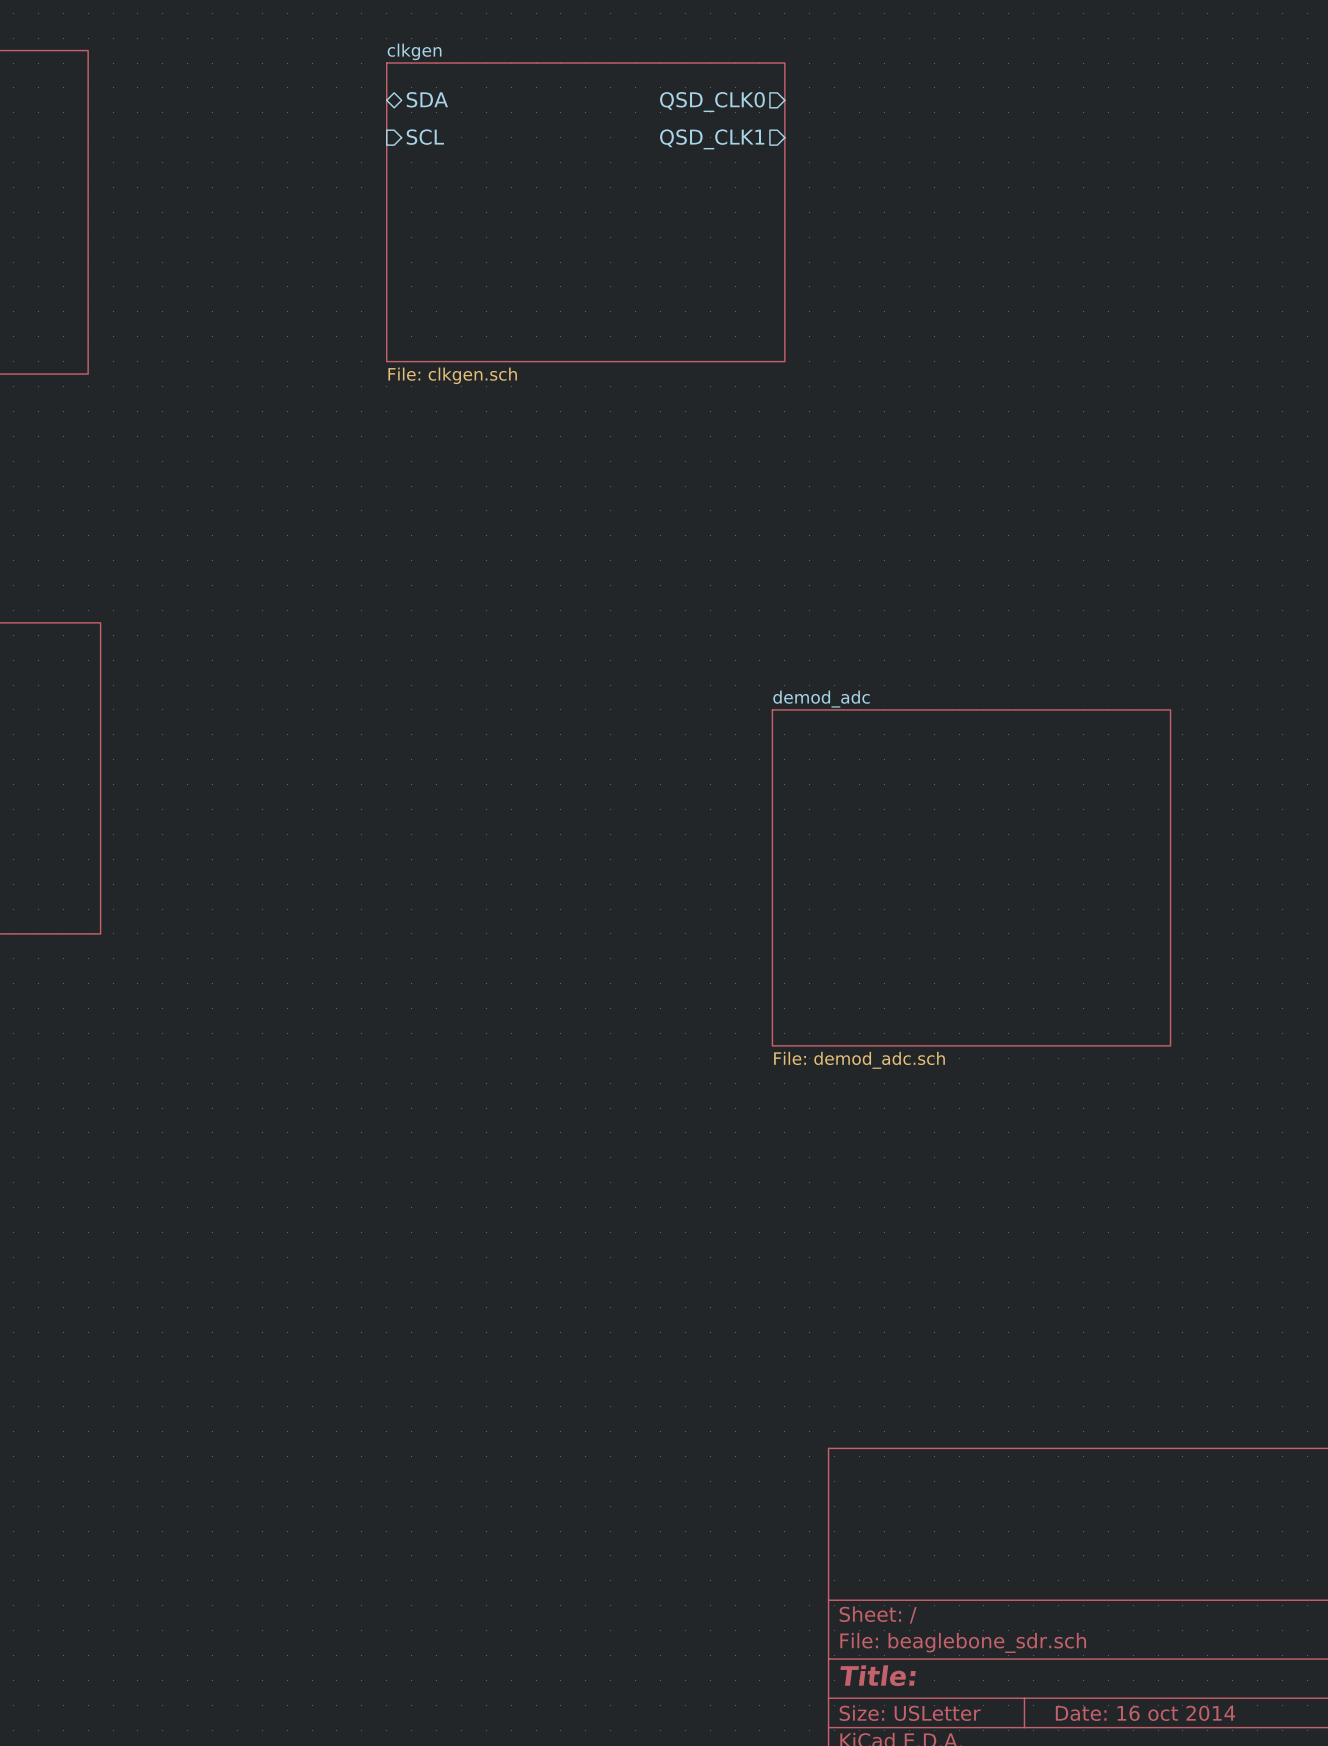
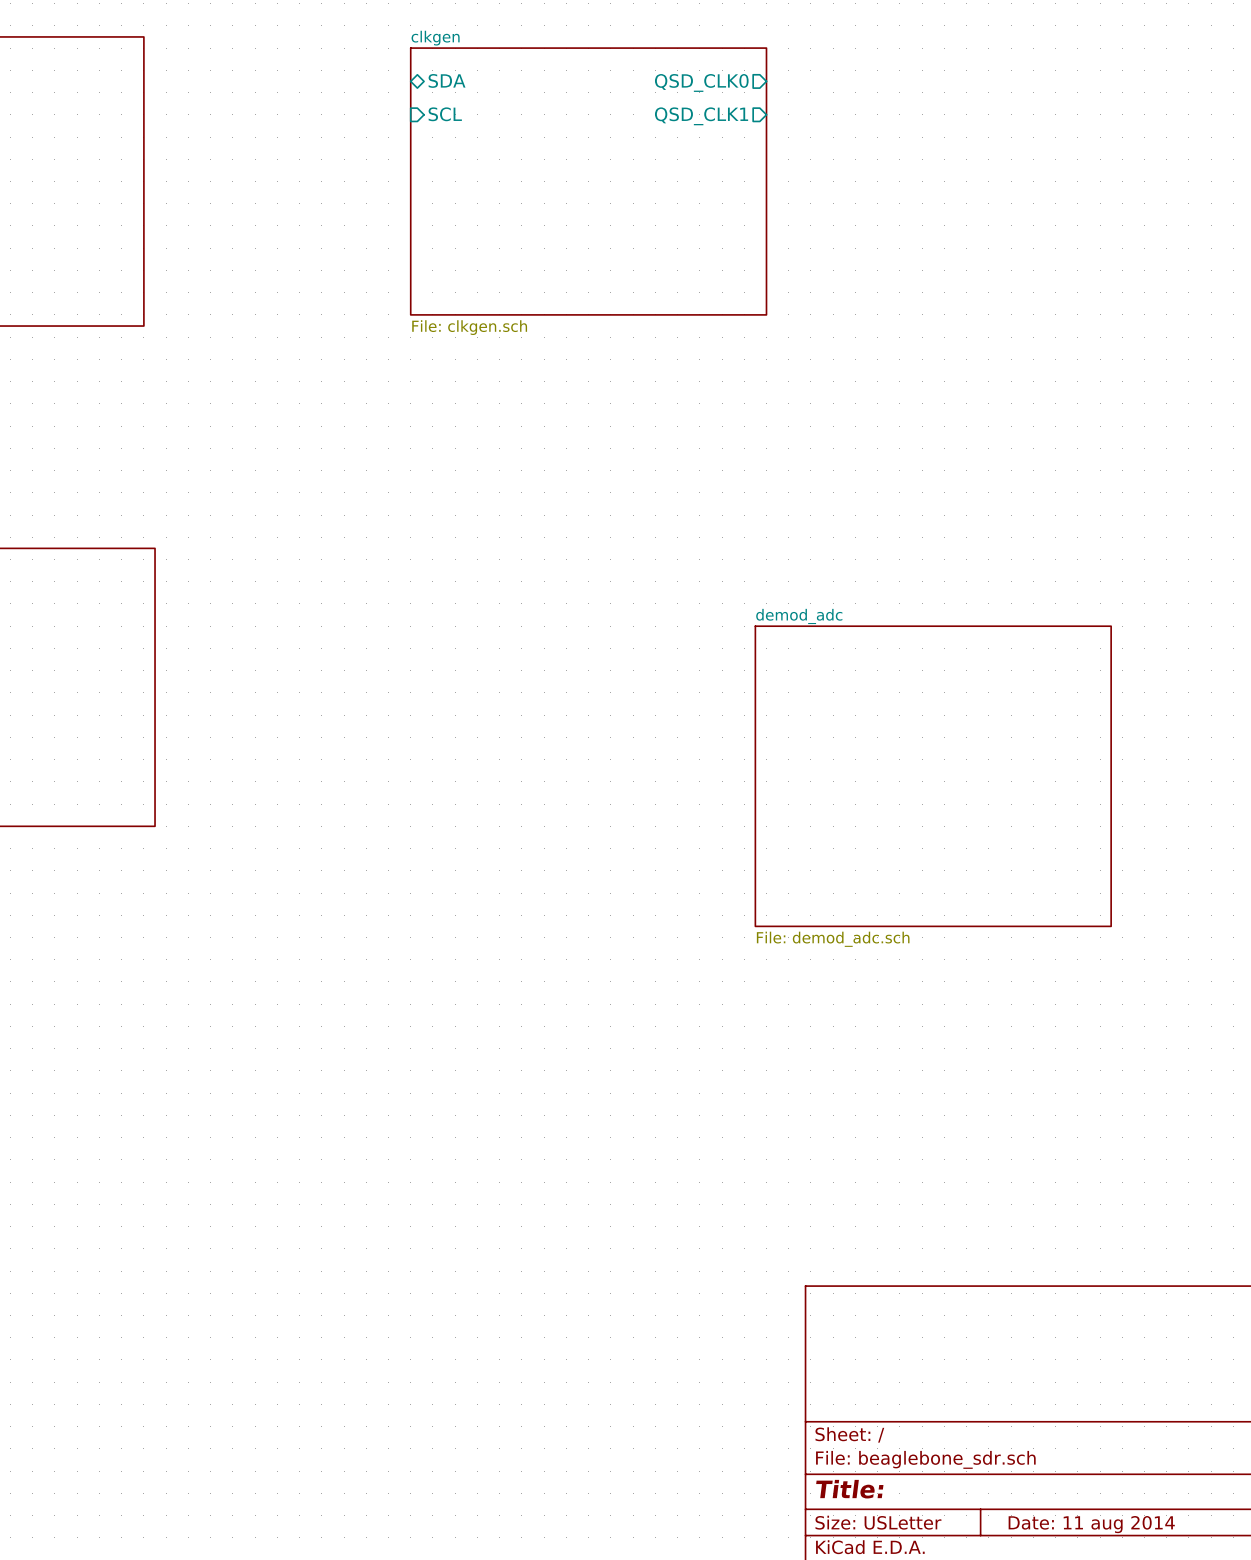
title block: Date: 16 oct 2014 (1145, 1713) -> Date: 11 aug 2014 (1091, 1524)

